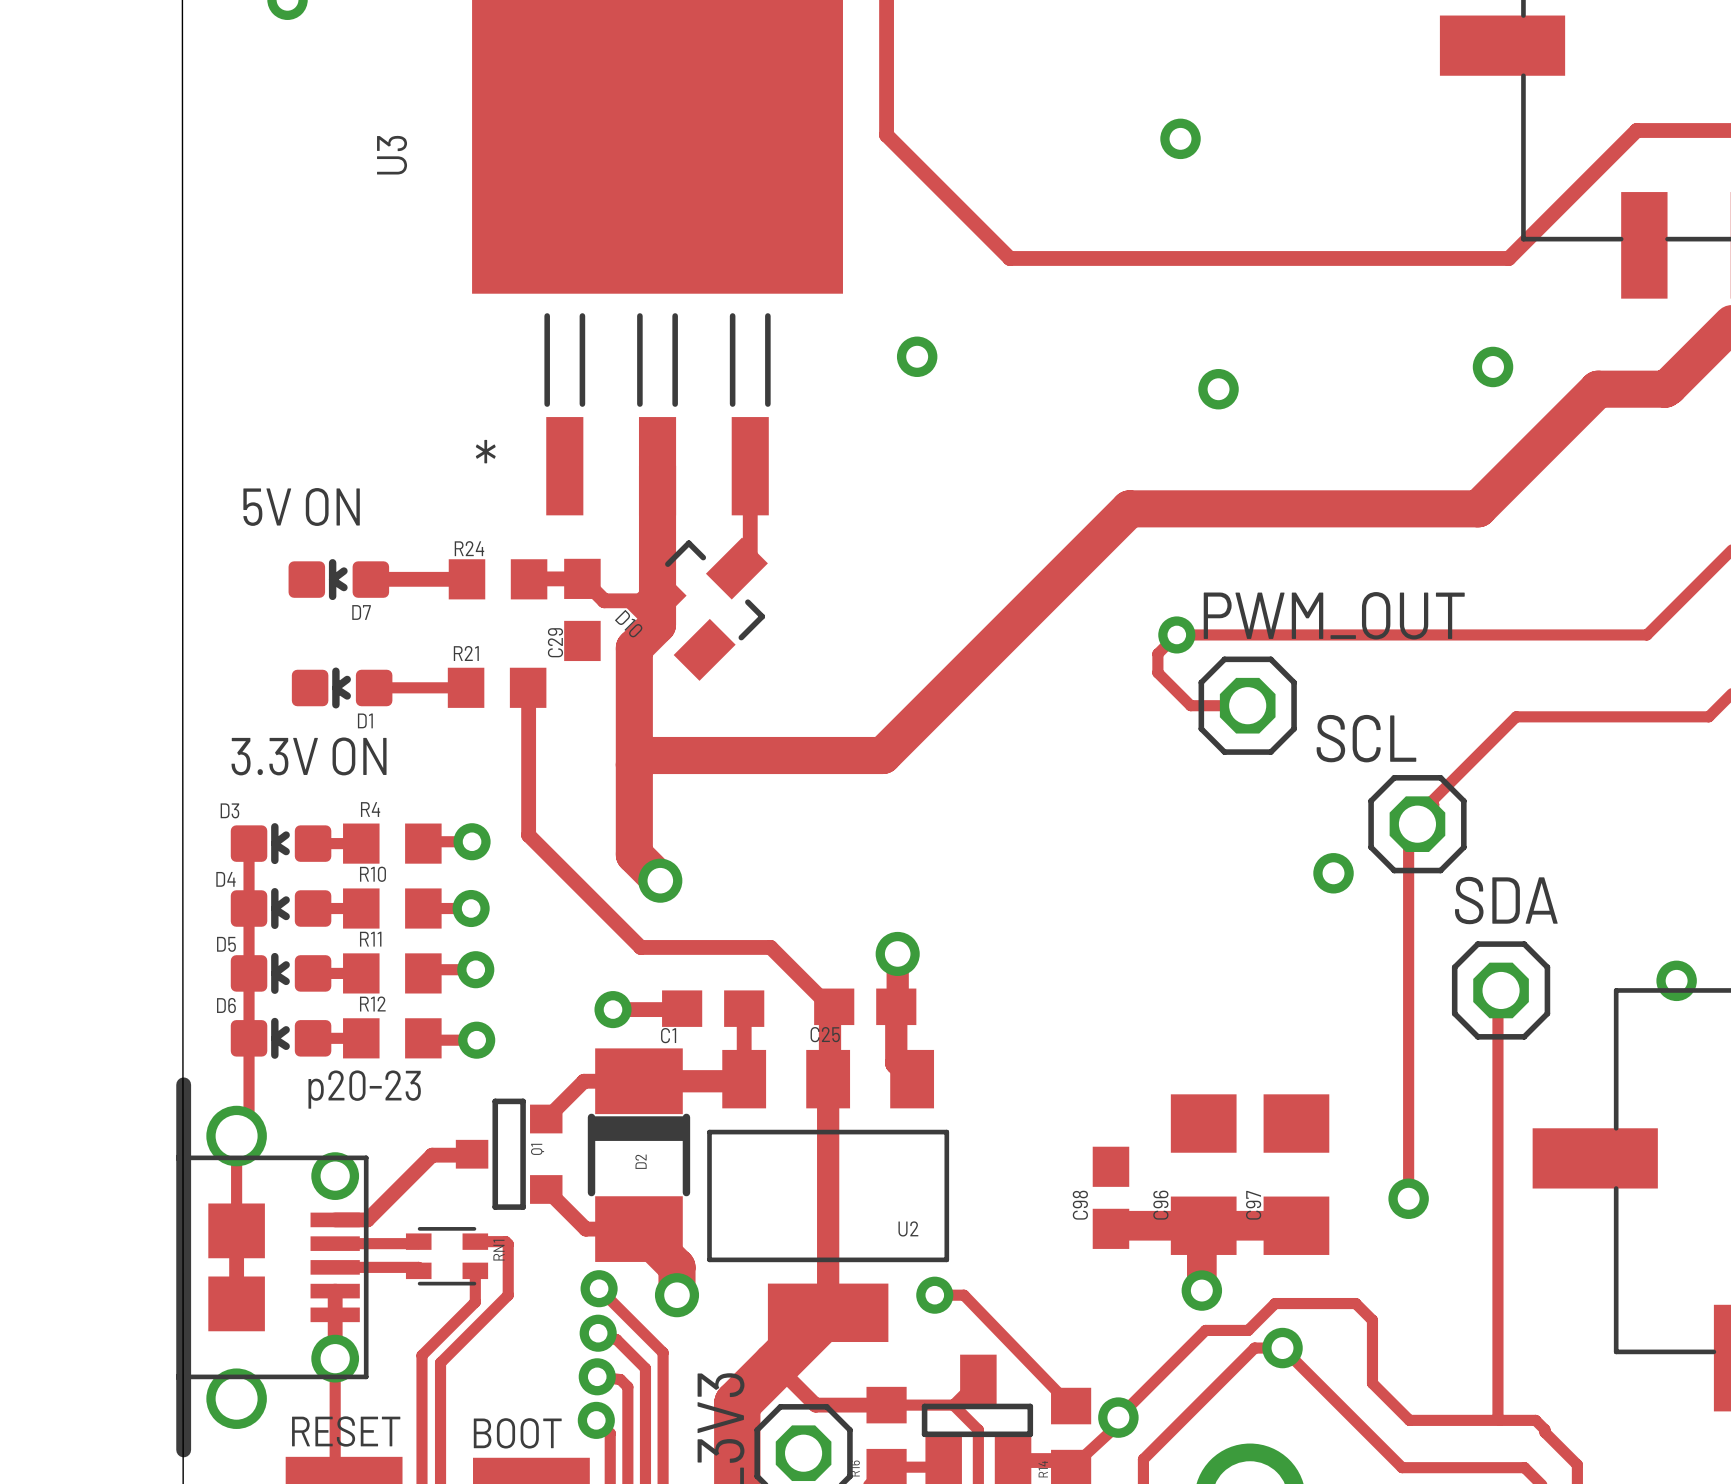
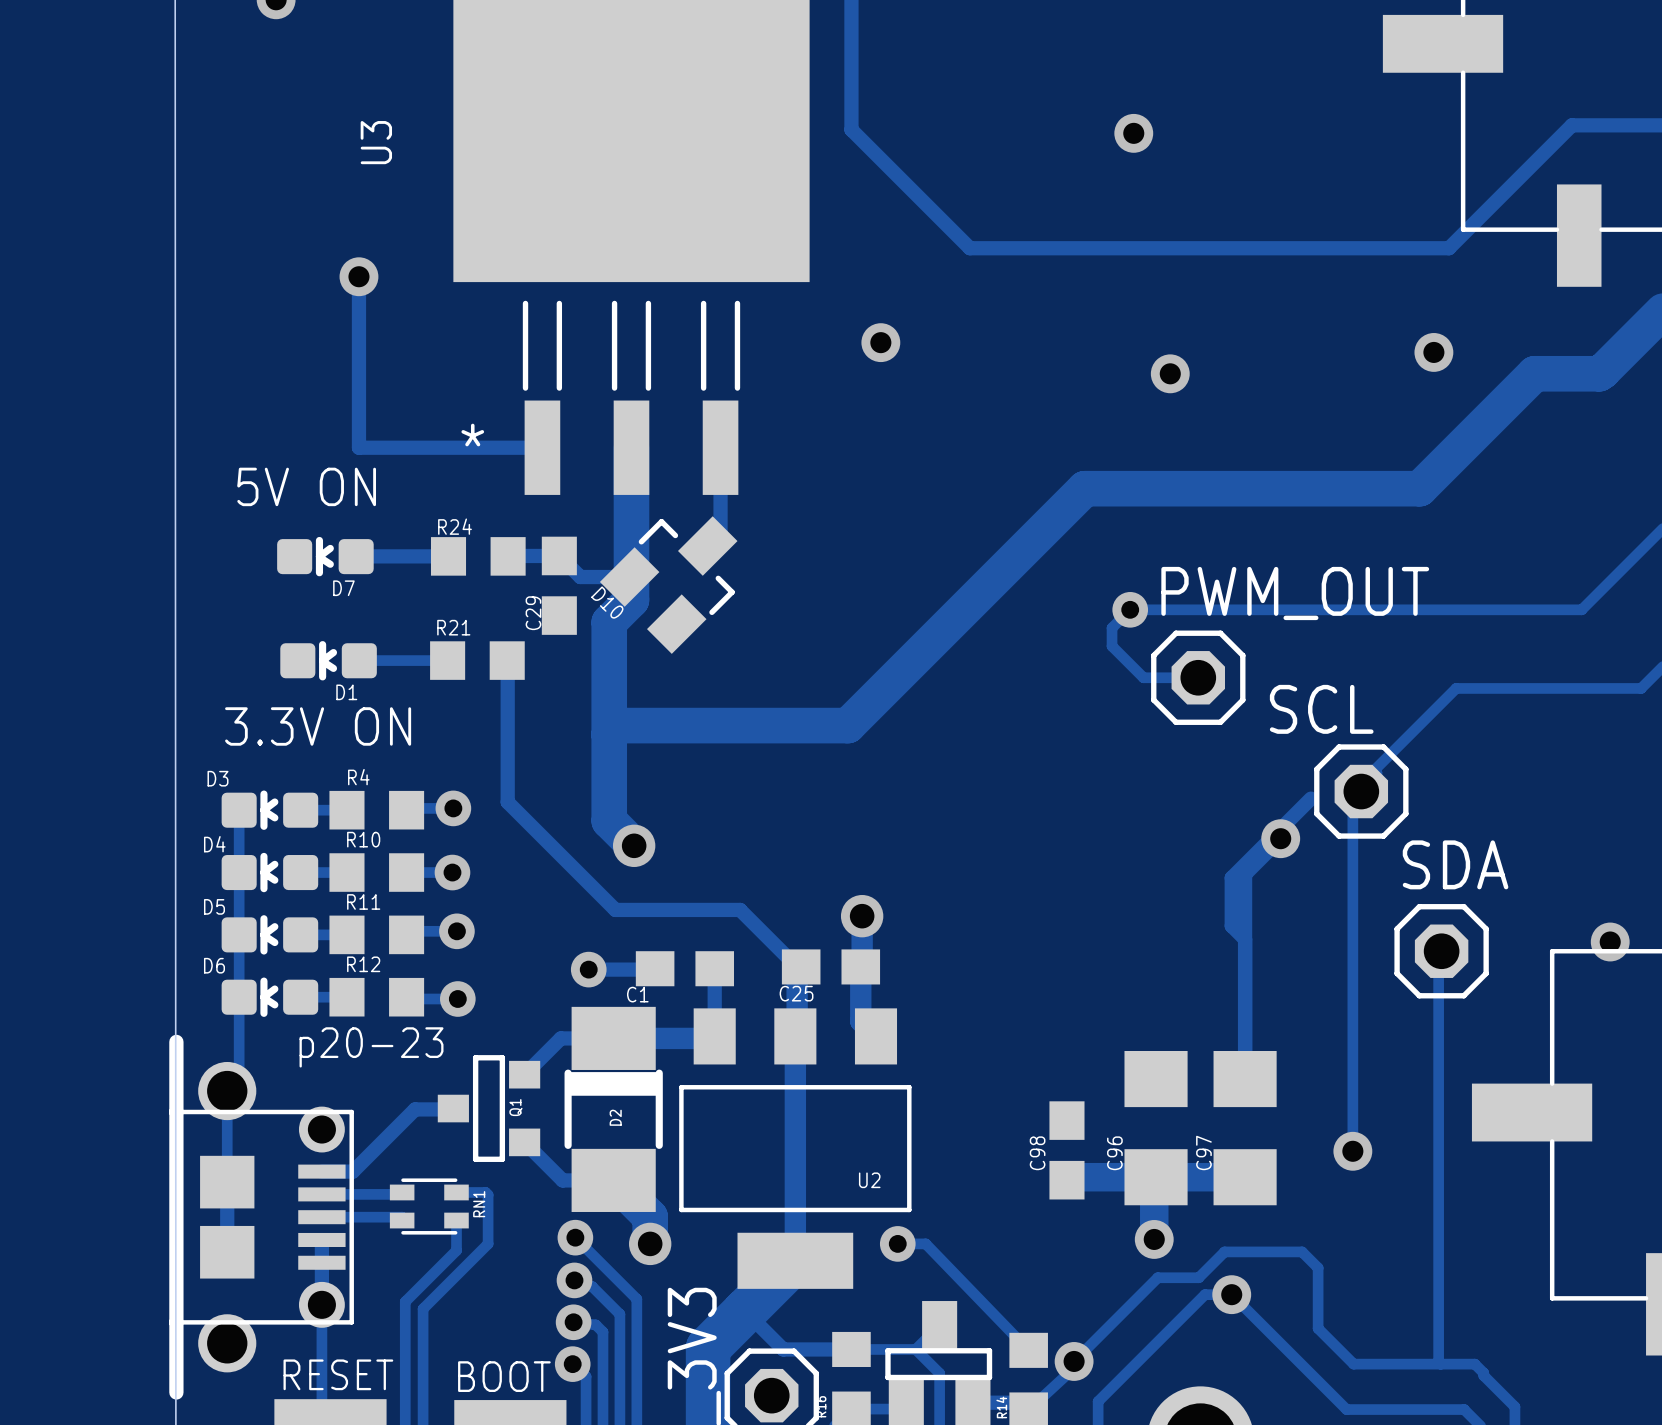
track: none -> (358, 276) (358, 447) (542, 447)
via: none -> (358, 276)
track: none -> (1310, 798) (1231, 877) (1231, 925) (1245, 939)
track: none -> (1280, 838) (1245, 874) (1245, 1079)

